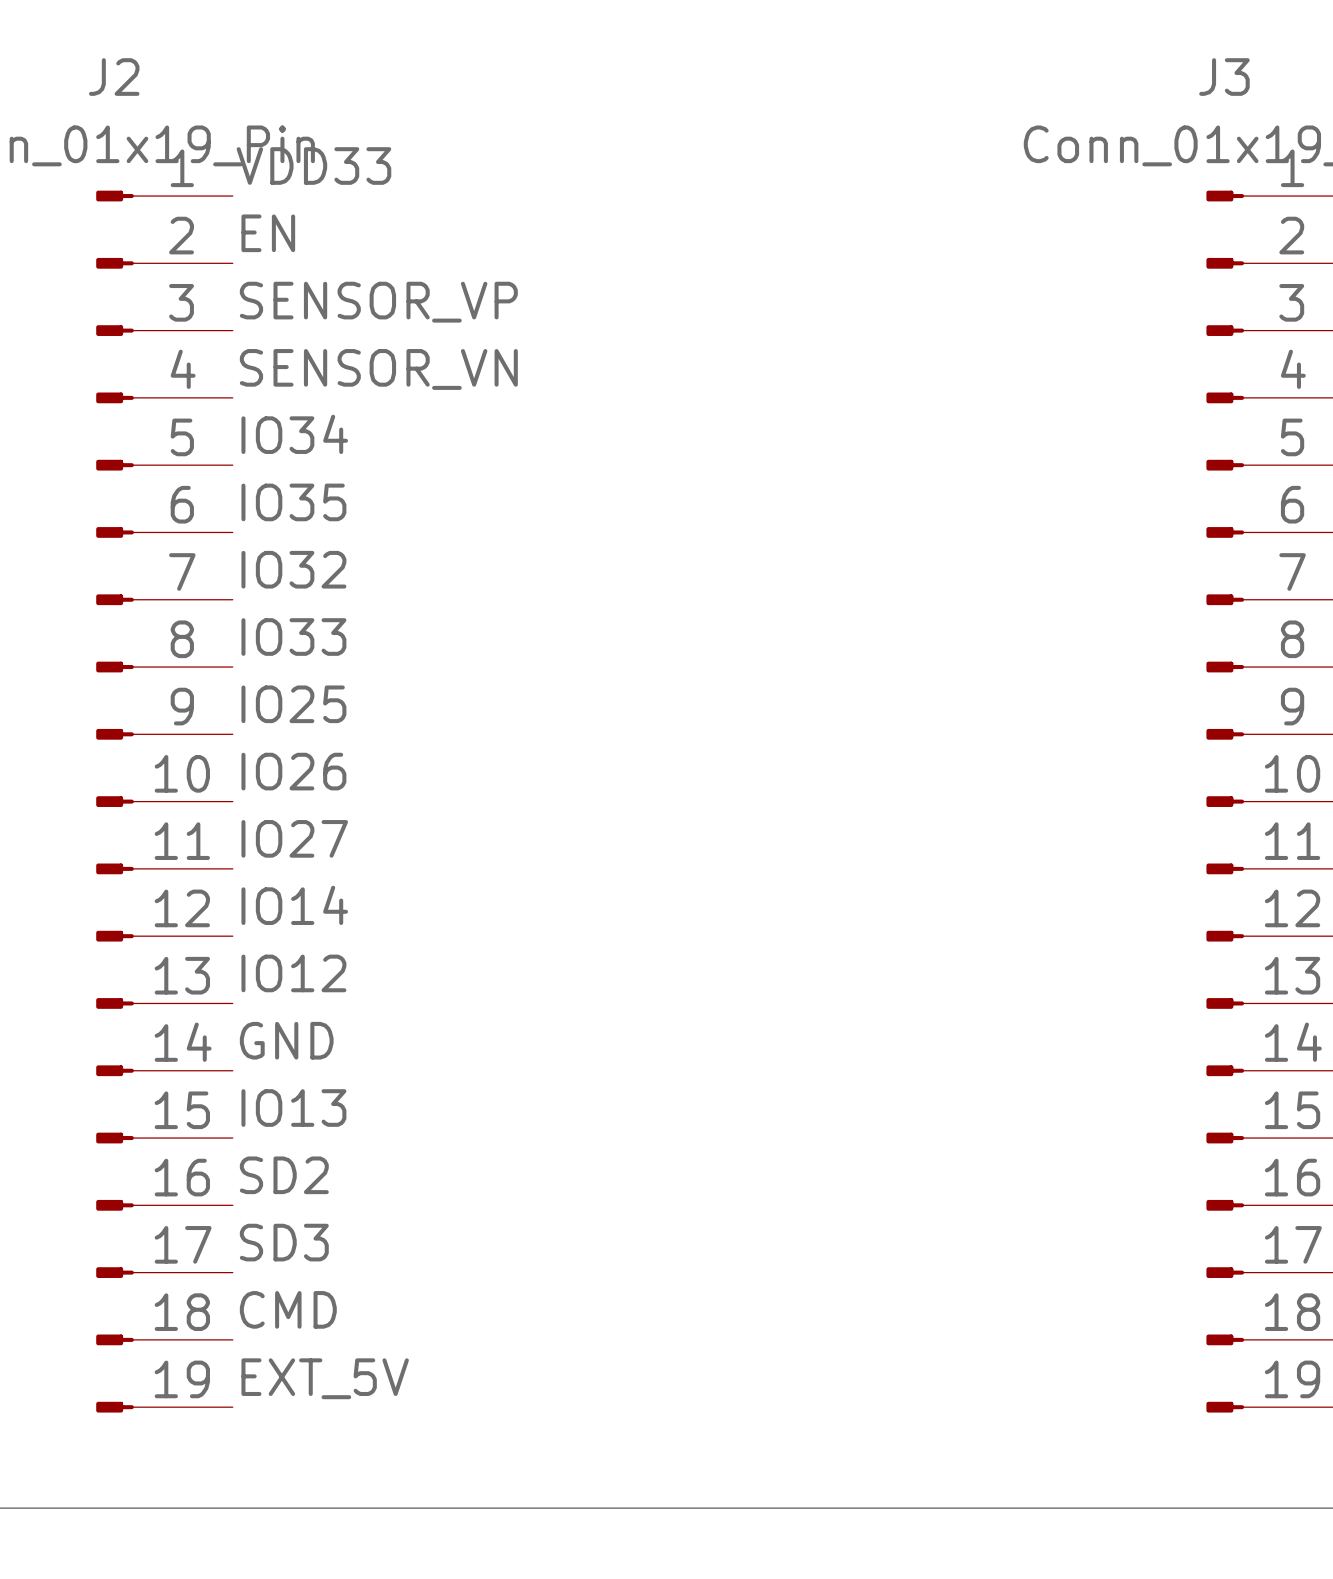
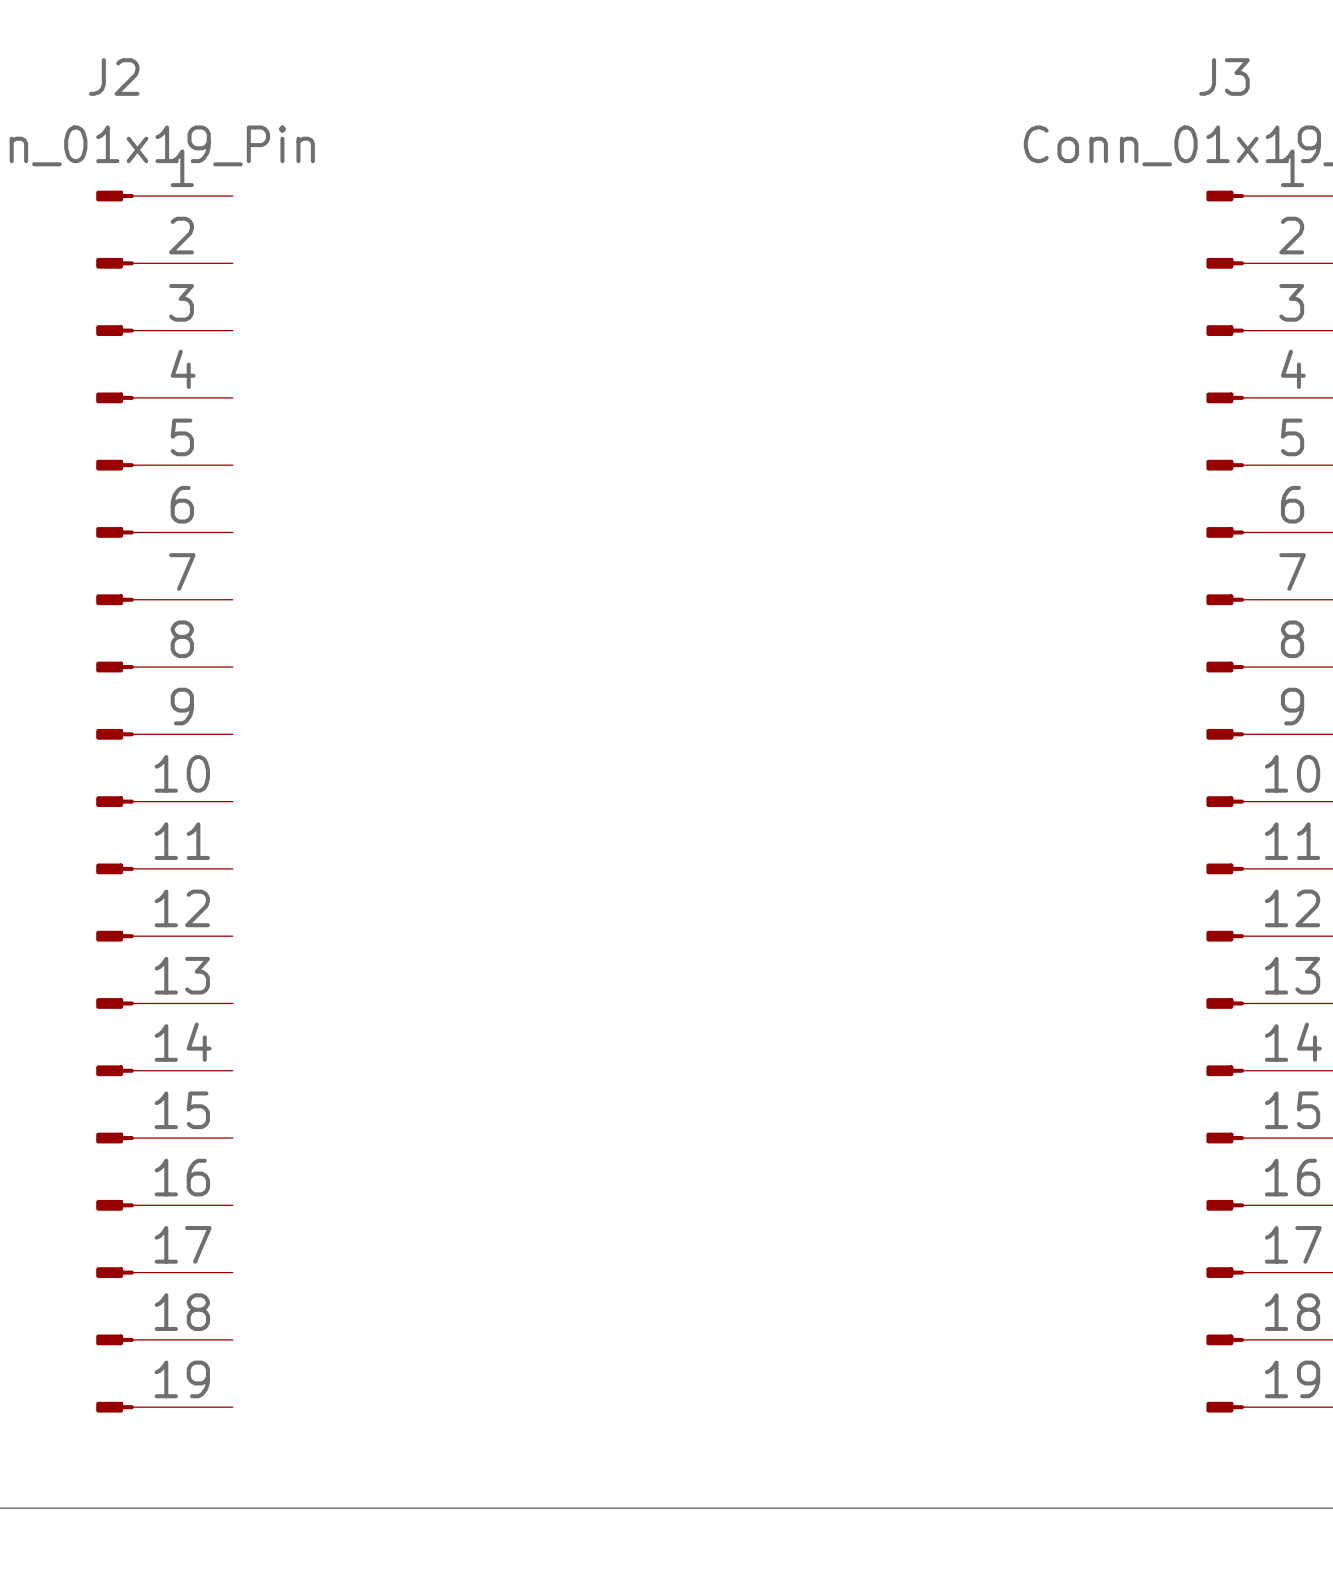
label: VDD33 (313, 166) -> none
label: EN (268, 233) -> none
label: SENSOR_VP (378, 302) -> none
label: SENSOR_VN (378, 369) -> none
label: IO34 (294, 434) -> none
label: IO35 (293, 502) -> none
label: IO32 (293, 569) -> none
label: IO33 (293, 637) -> none
label: IO25 (293, 704) -> none
label: IO26 (293, 771) -> none
label: IO27 (294, 838) -> none
label: IO14 (294, 905) -> none
label: IO12 (293, 973) -> none
label: GND (286, 1040) -> none
label: IO13 (293, 1108) -> none
label: SD2 (284, 1175) -> none
label: SD3 (284, 1242) -> none
label: CMD (288, 1309) -> none
label: EXT_5V (325, 1378) -> none

